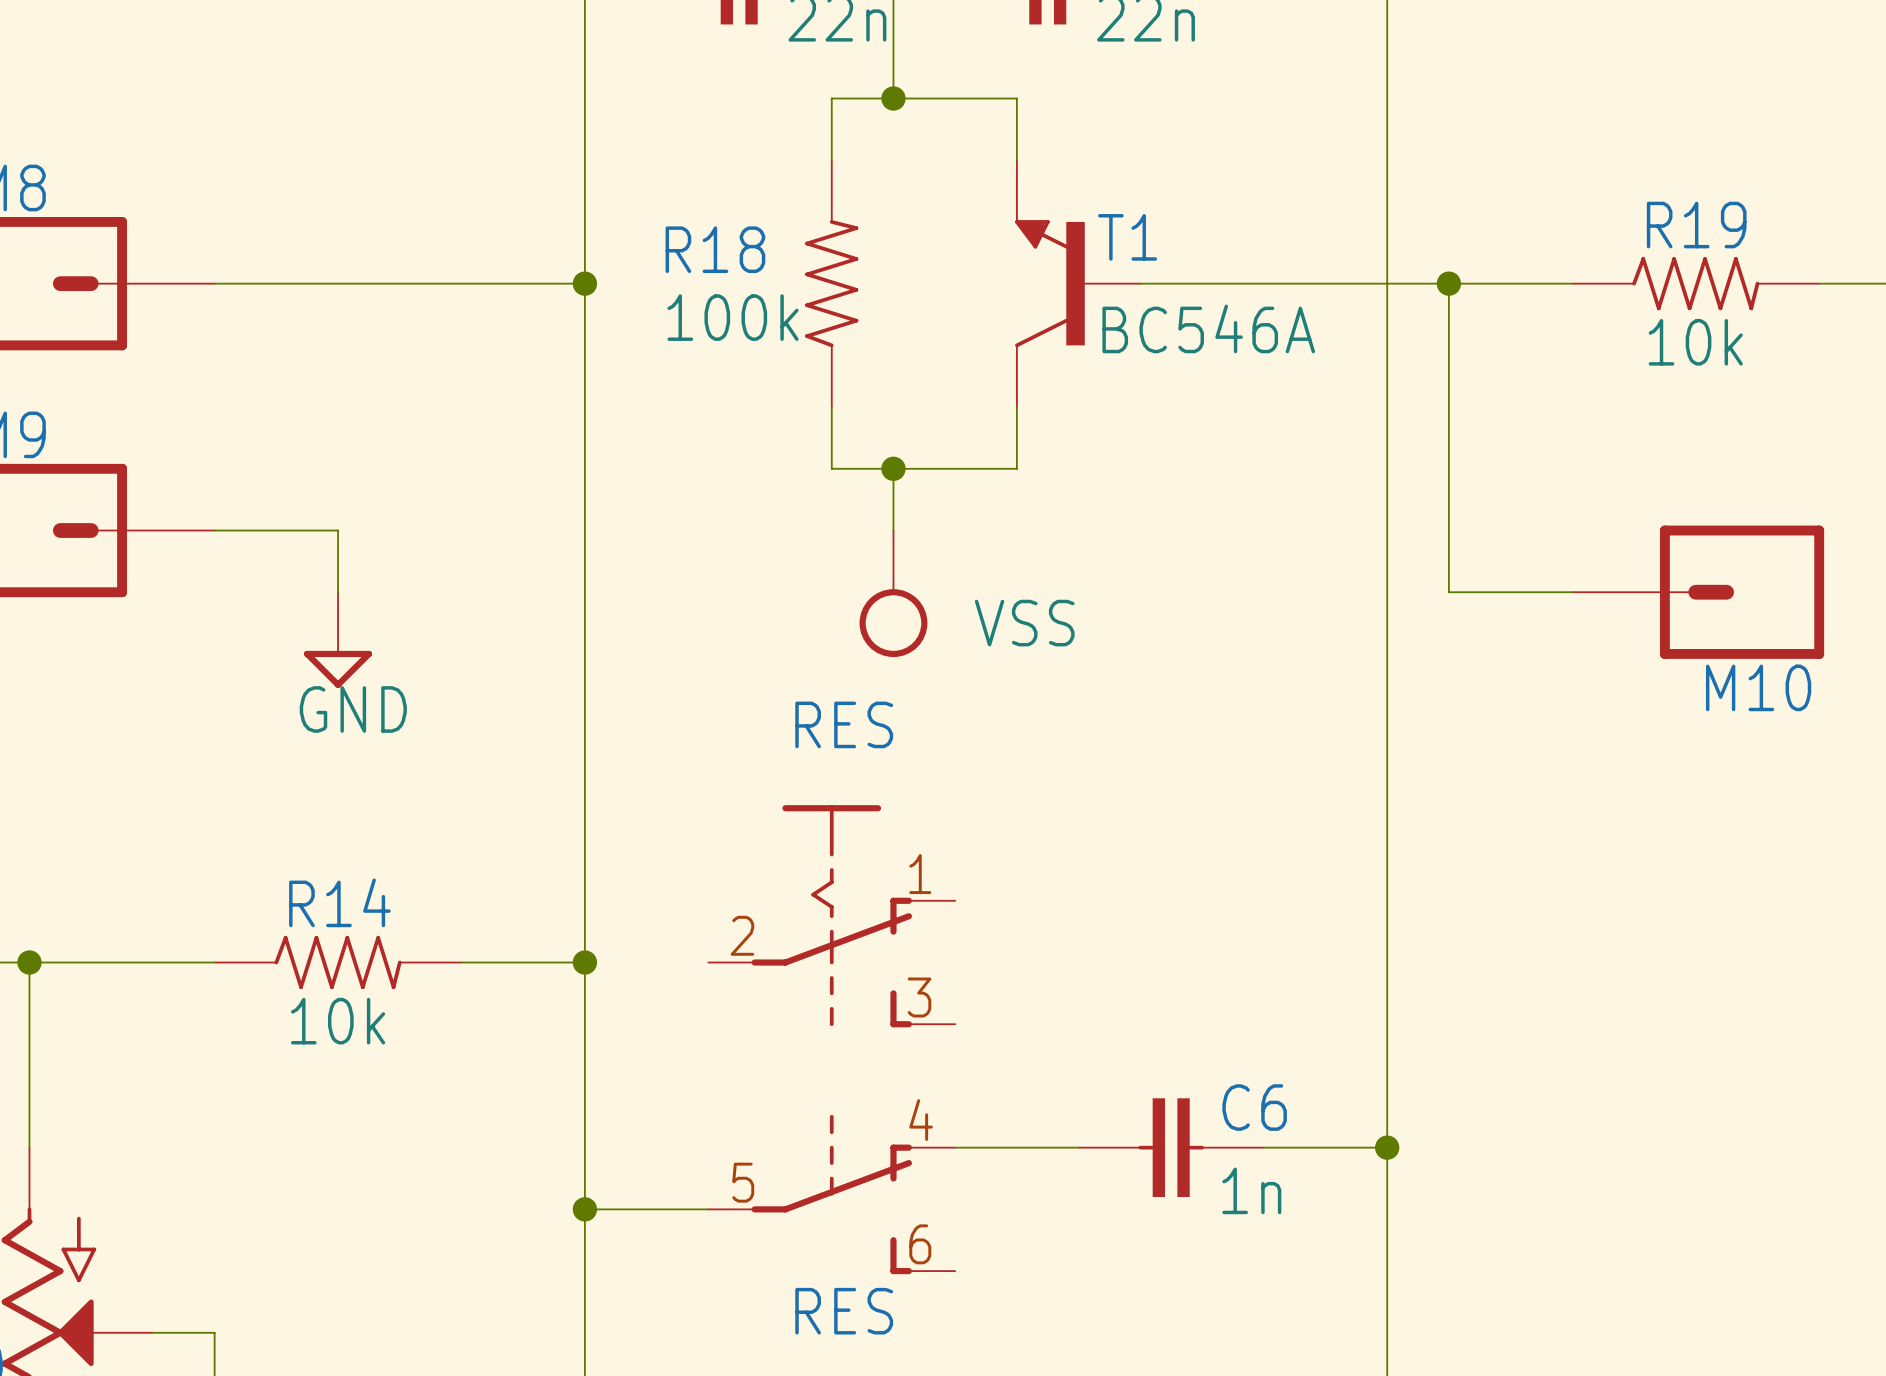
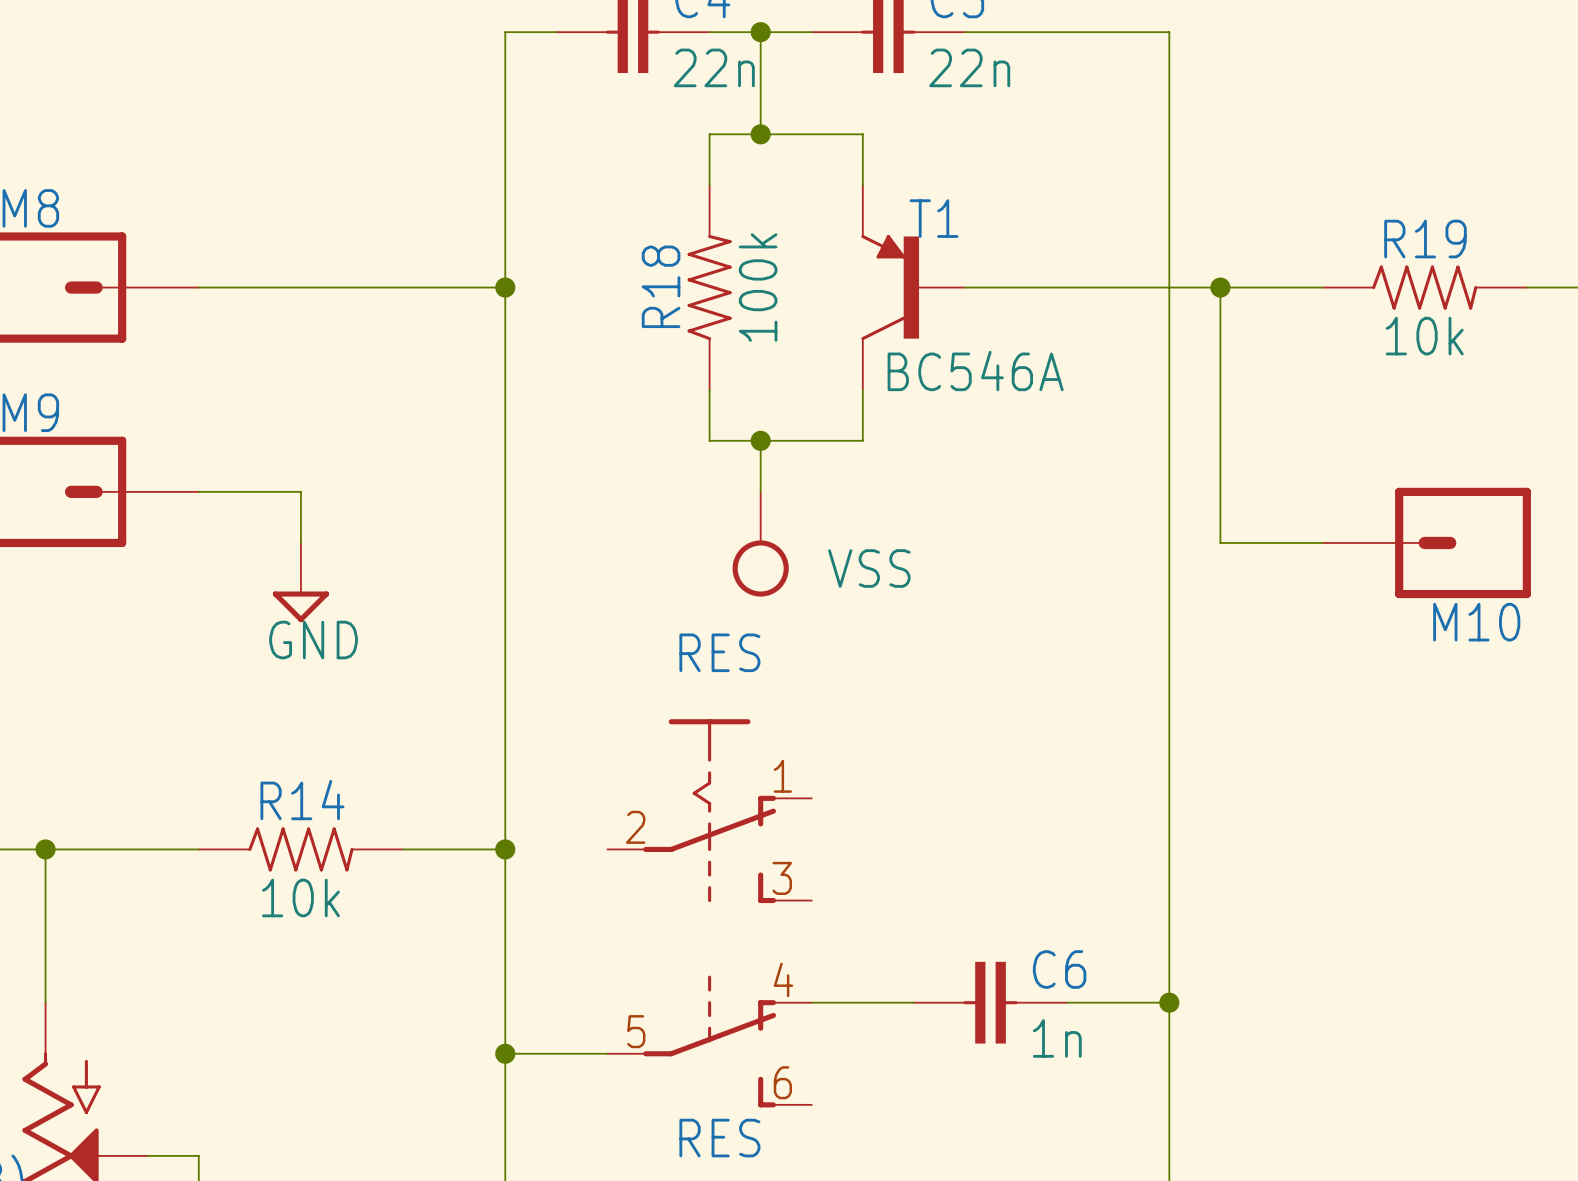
T1 symbol: [1015, 160, 1141, 408] -> [861, 185, 966, 390]
T1 name position: T1 (1127, 237) -> T1 (934, 218)
R18 name rotation: 0° (715, 249) -> 90° counterclockwise (661, 286)
R18 value rotation: 0° (733, 317) -> 90° counterclockwise (758, 287)
T1 value position: BC546A (1208, 328) -> BC546A (975, 370)

